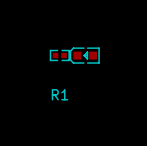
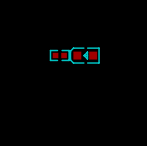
R1 name: R1 (60, 94) -> none

